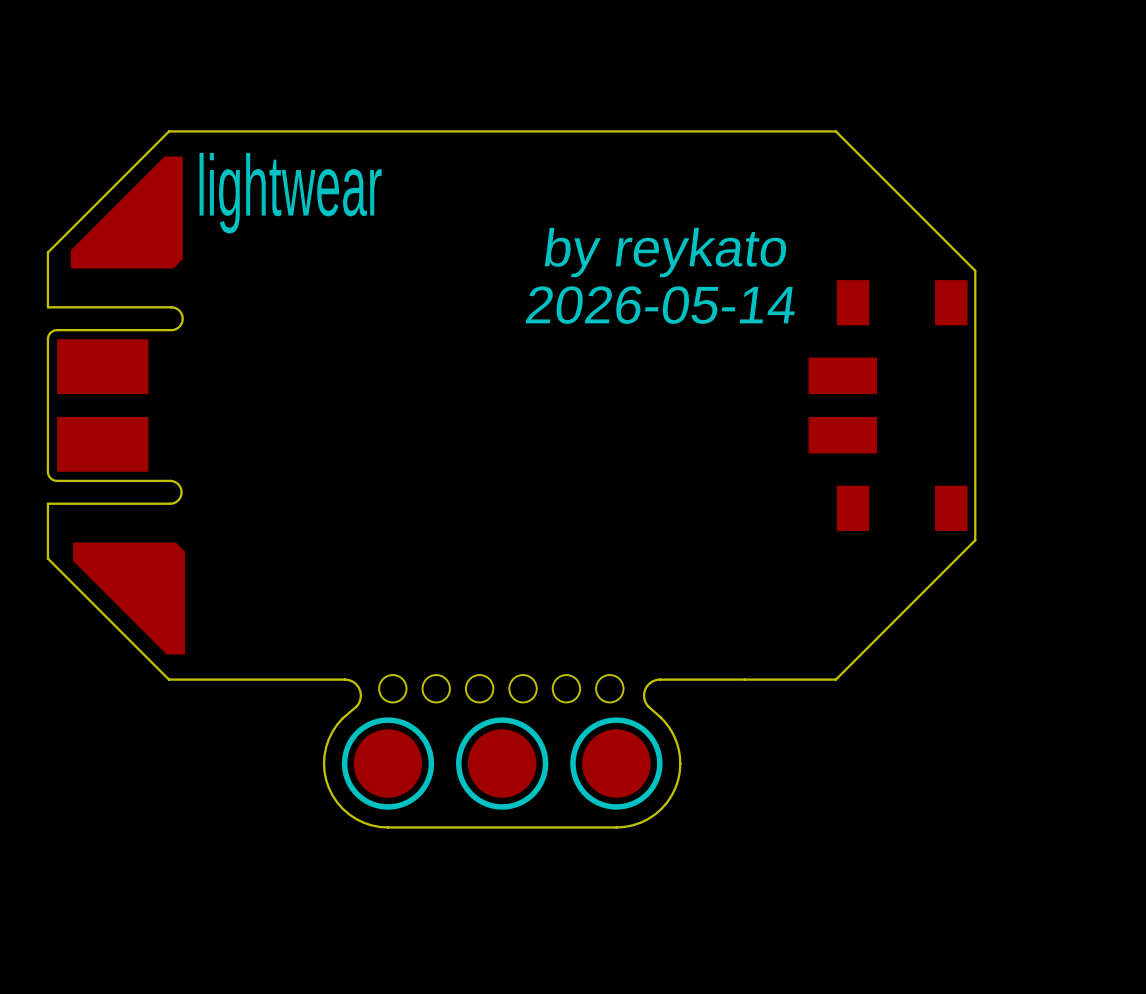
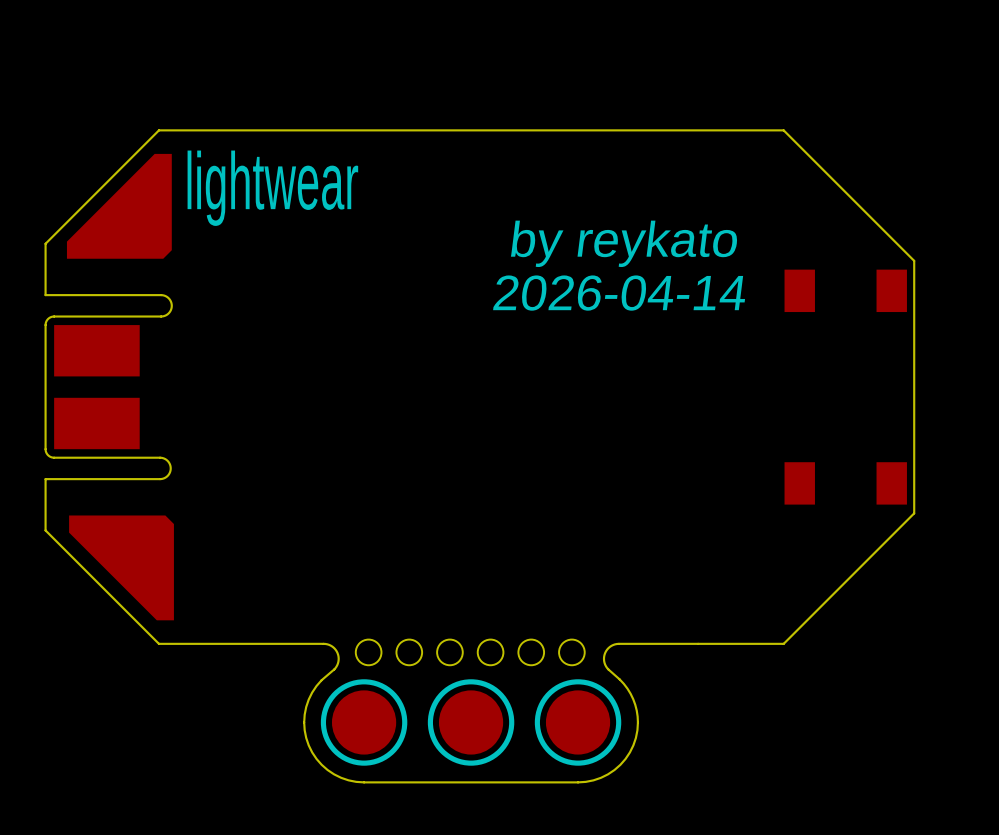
text: 2026-05-14 (660, 305) -> 2026-04-14 (619, 293)
part: (842, 375) -> none
part: (842, 435) -> none

